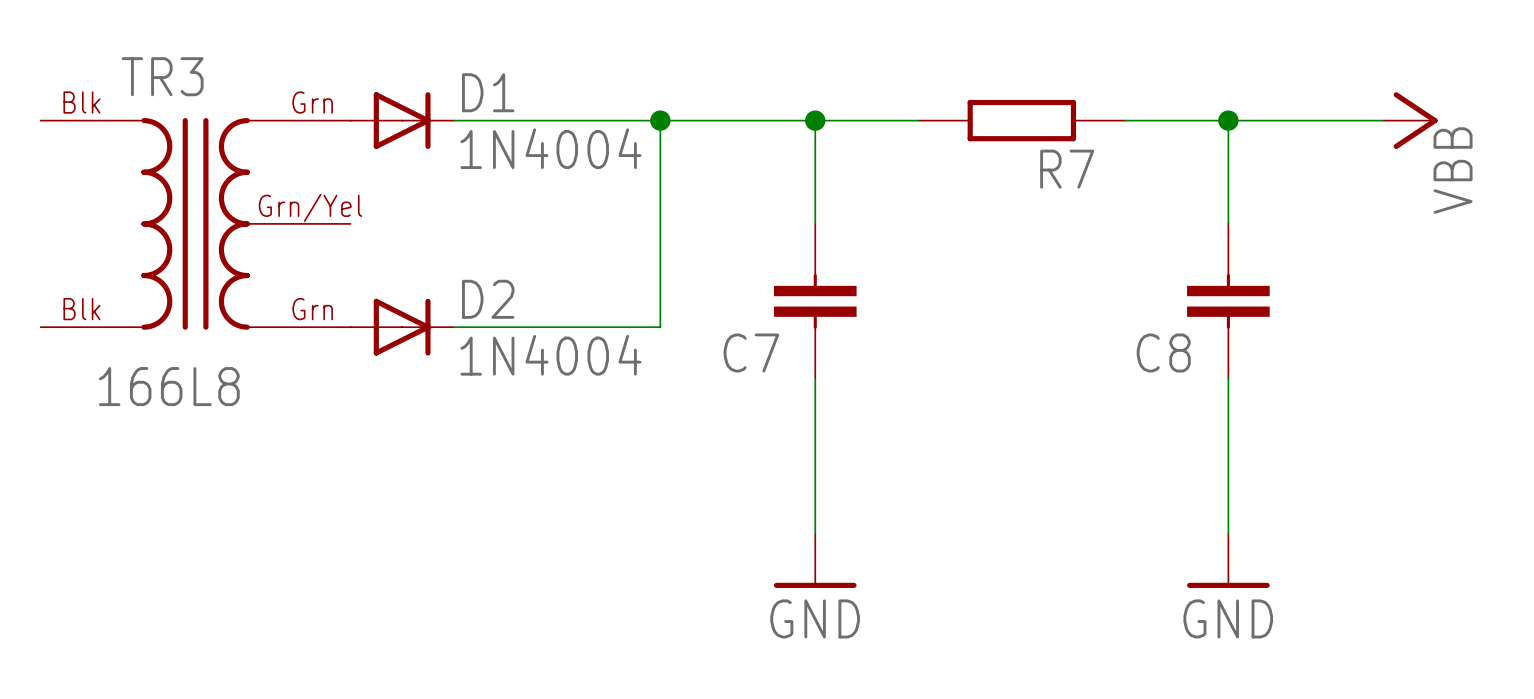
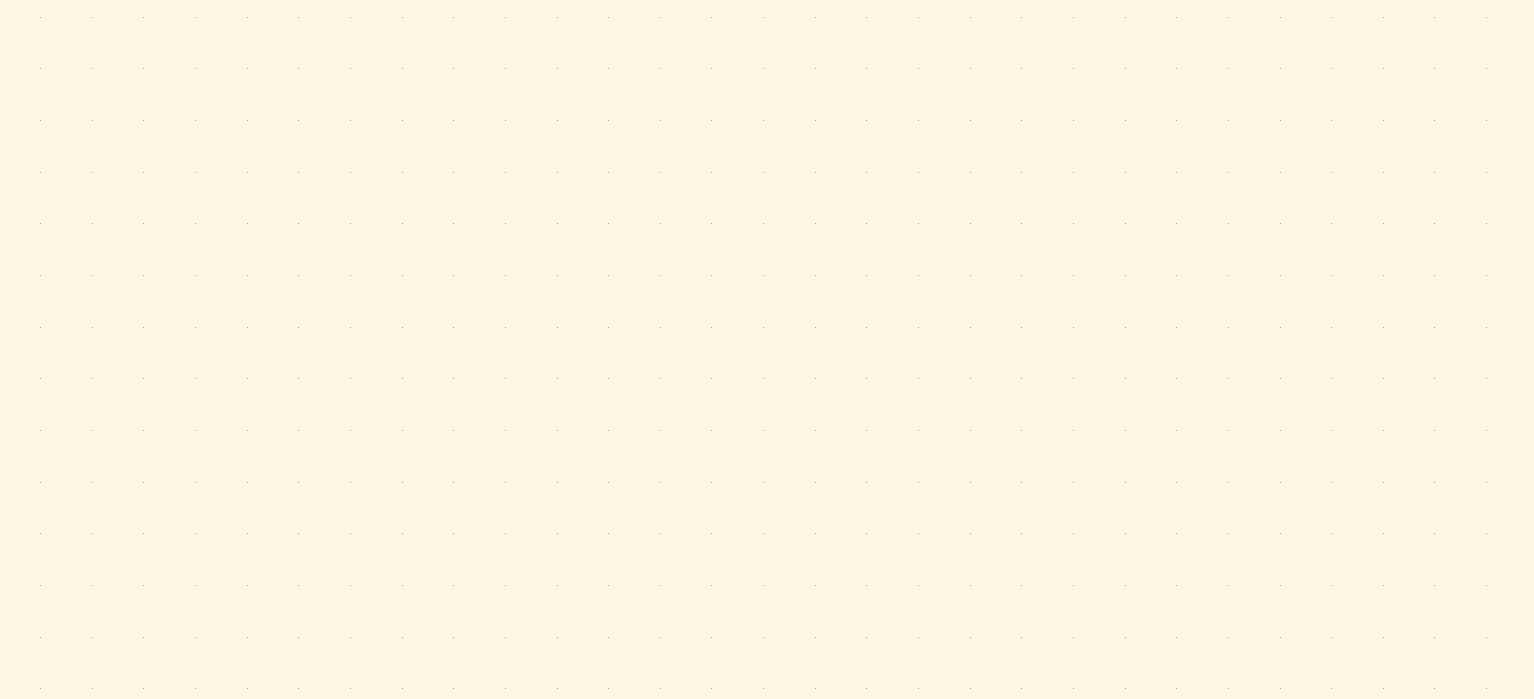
D1: 1N4004 (402, 120) -> none
wire: (453, 120) (918, 120) -> none
wire: (660, 120) (660, 327) (453, 327) -> none
junction: (660, 120) -> none
wire: (815, 120) (815, 223) -> none
junction: (815, 120) -> none
R7: (1021, 120) -> none
wire: (1125, 120) (1383, 120) -> none
wire: (1228, 120) (1228, 223) -> none
junction: (1228, 120) -> none
power symbol: (1410, 120) -> none
TR3: 166L8 (195, 223) -> none
C7: (815, 301) -> none
C8: (1228, 301) -> none
D2: 1N4004 (402, 327) -> none
wire: (815, 378) (815, 533) -> none
wire: (1228, 378) (1228, 533) -> none
power symbol: GND (815, 560) -> none
power symbol: GND (1228, 560) -> none

